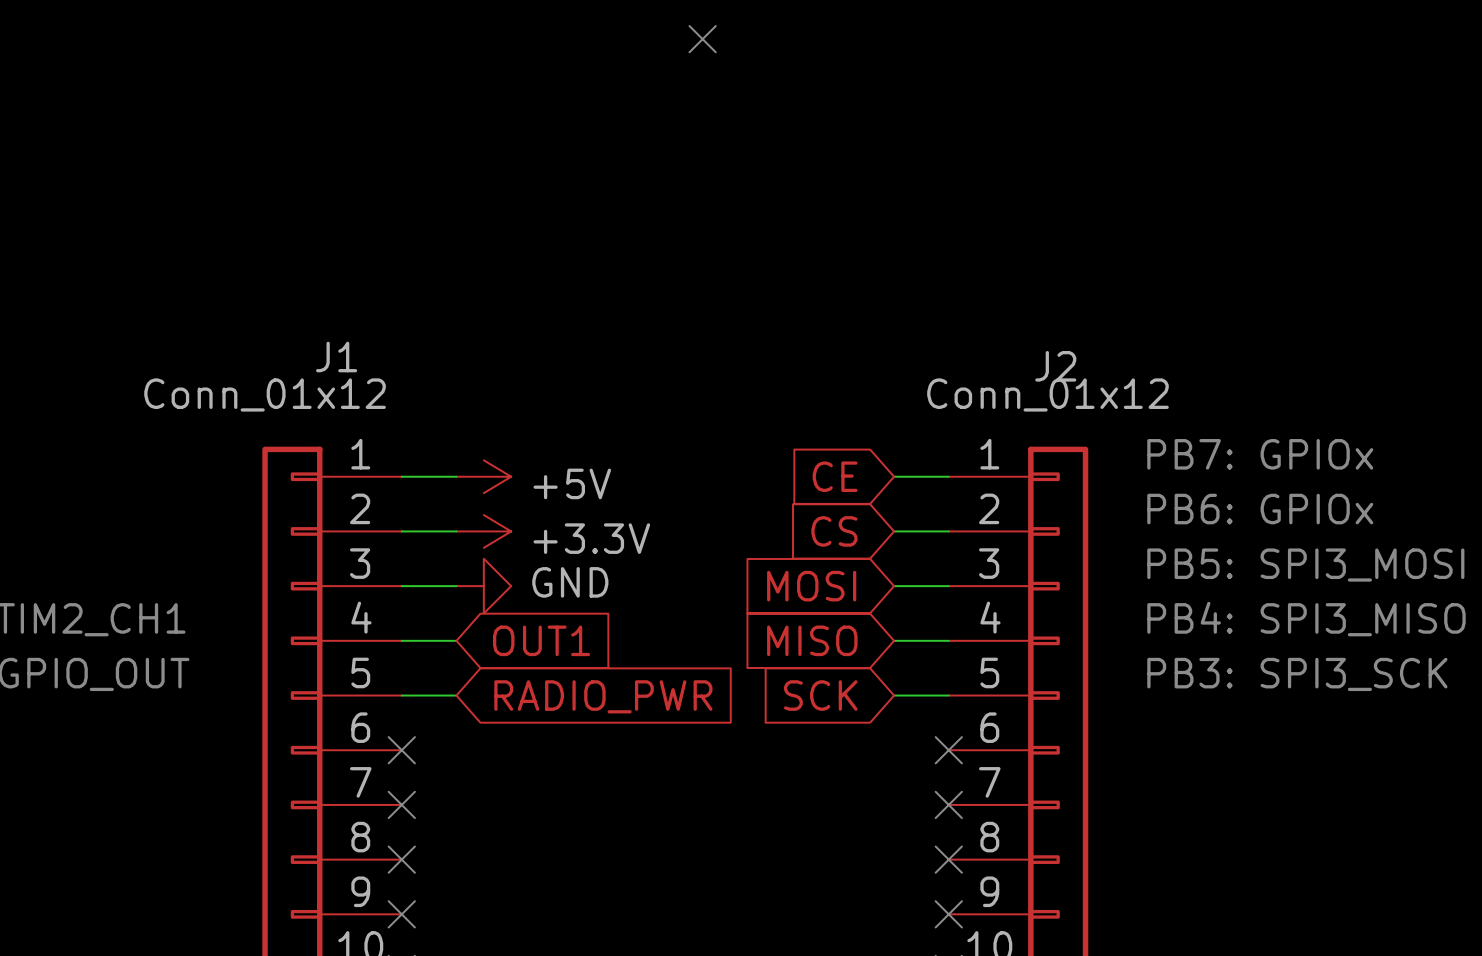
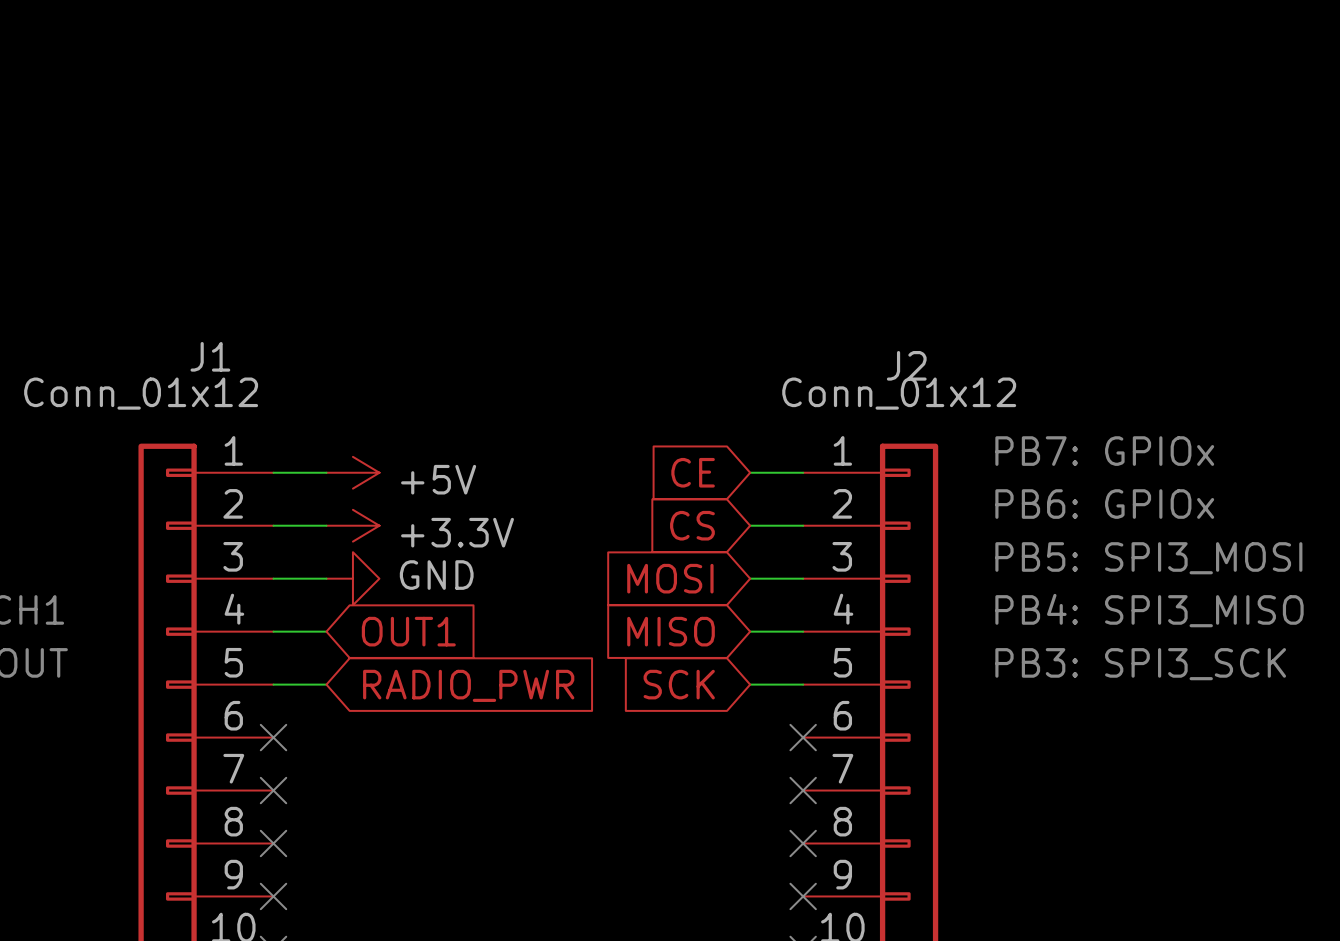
no-connect mark: (702, 39) -> none

